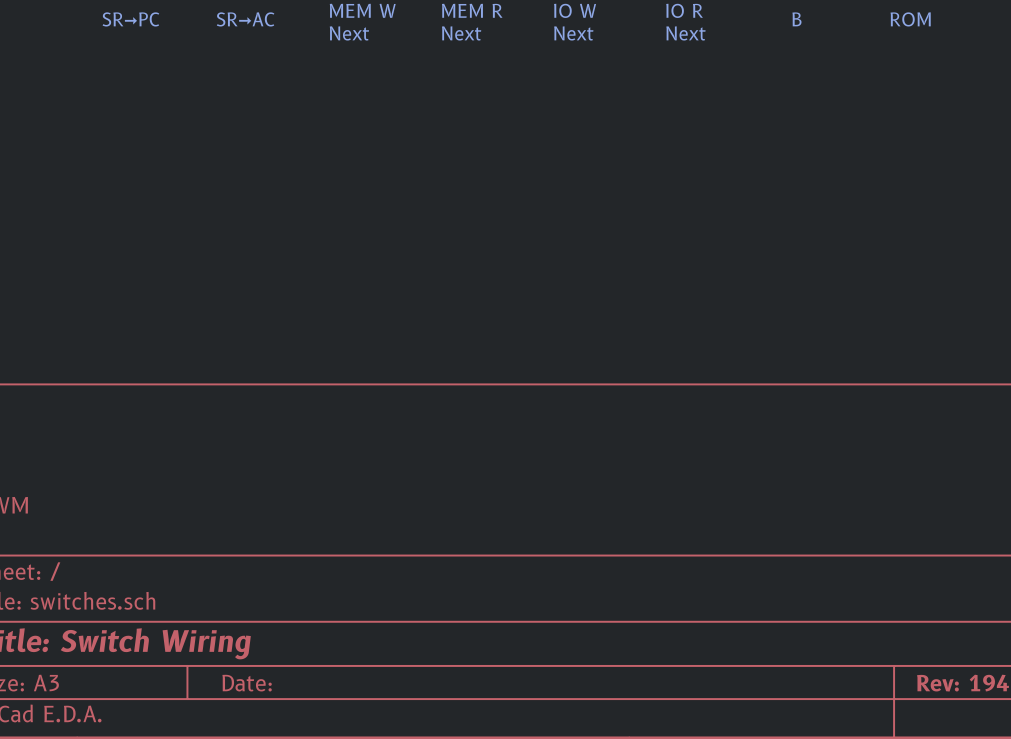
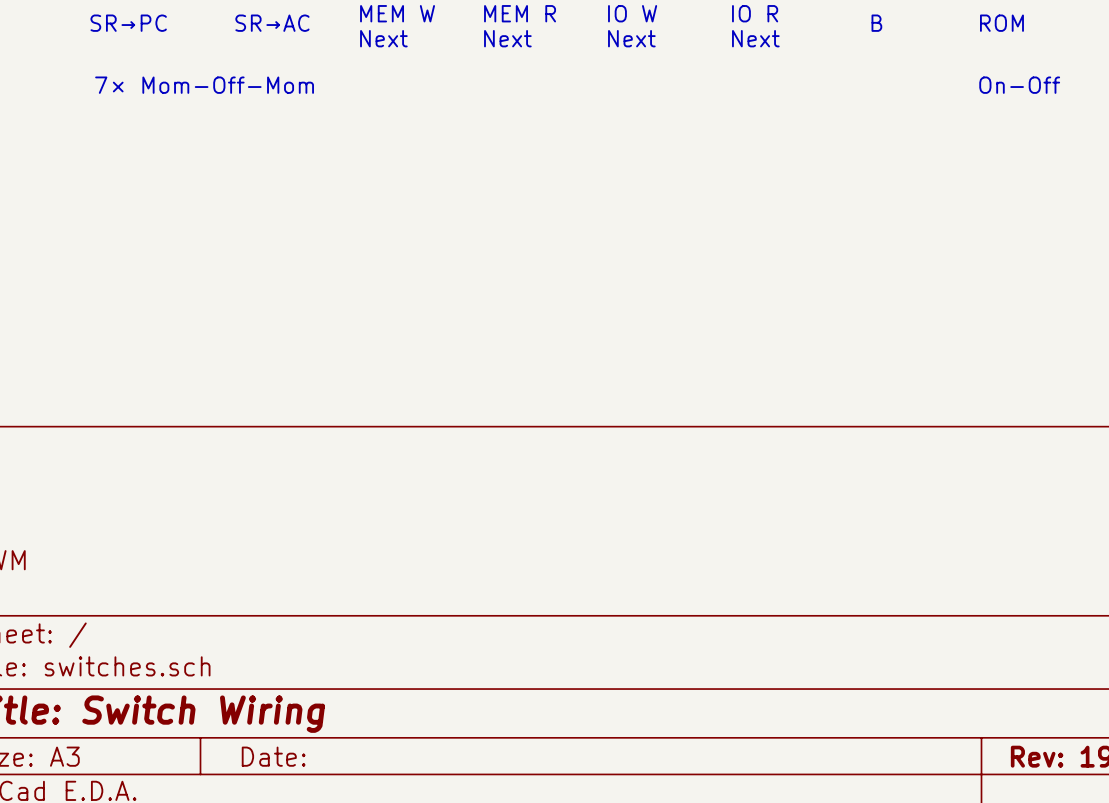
text: none -> 7× Mom-Off-Mom (204, 85)
text: none -> On-Off (1019, 85)

